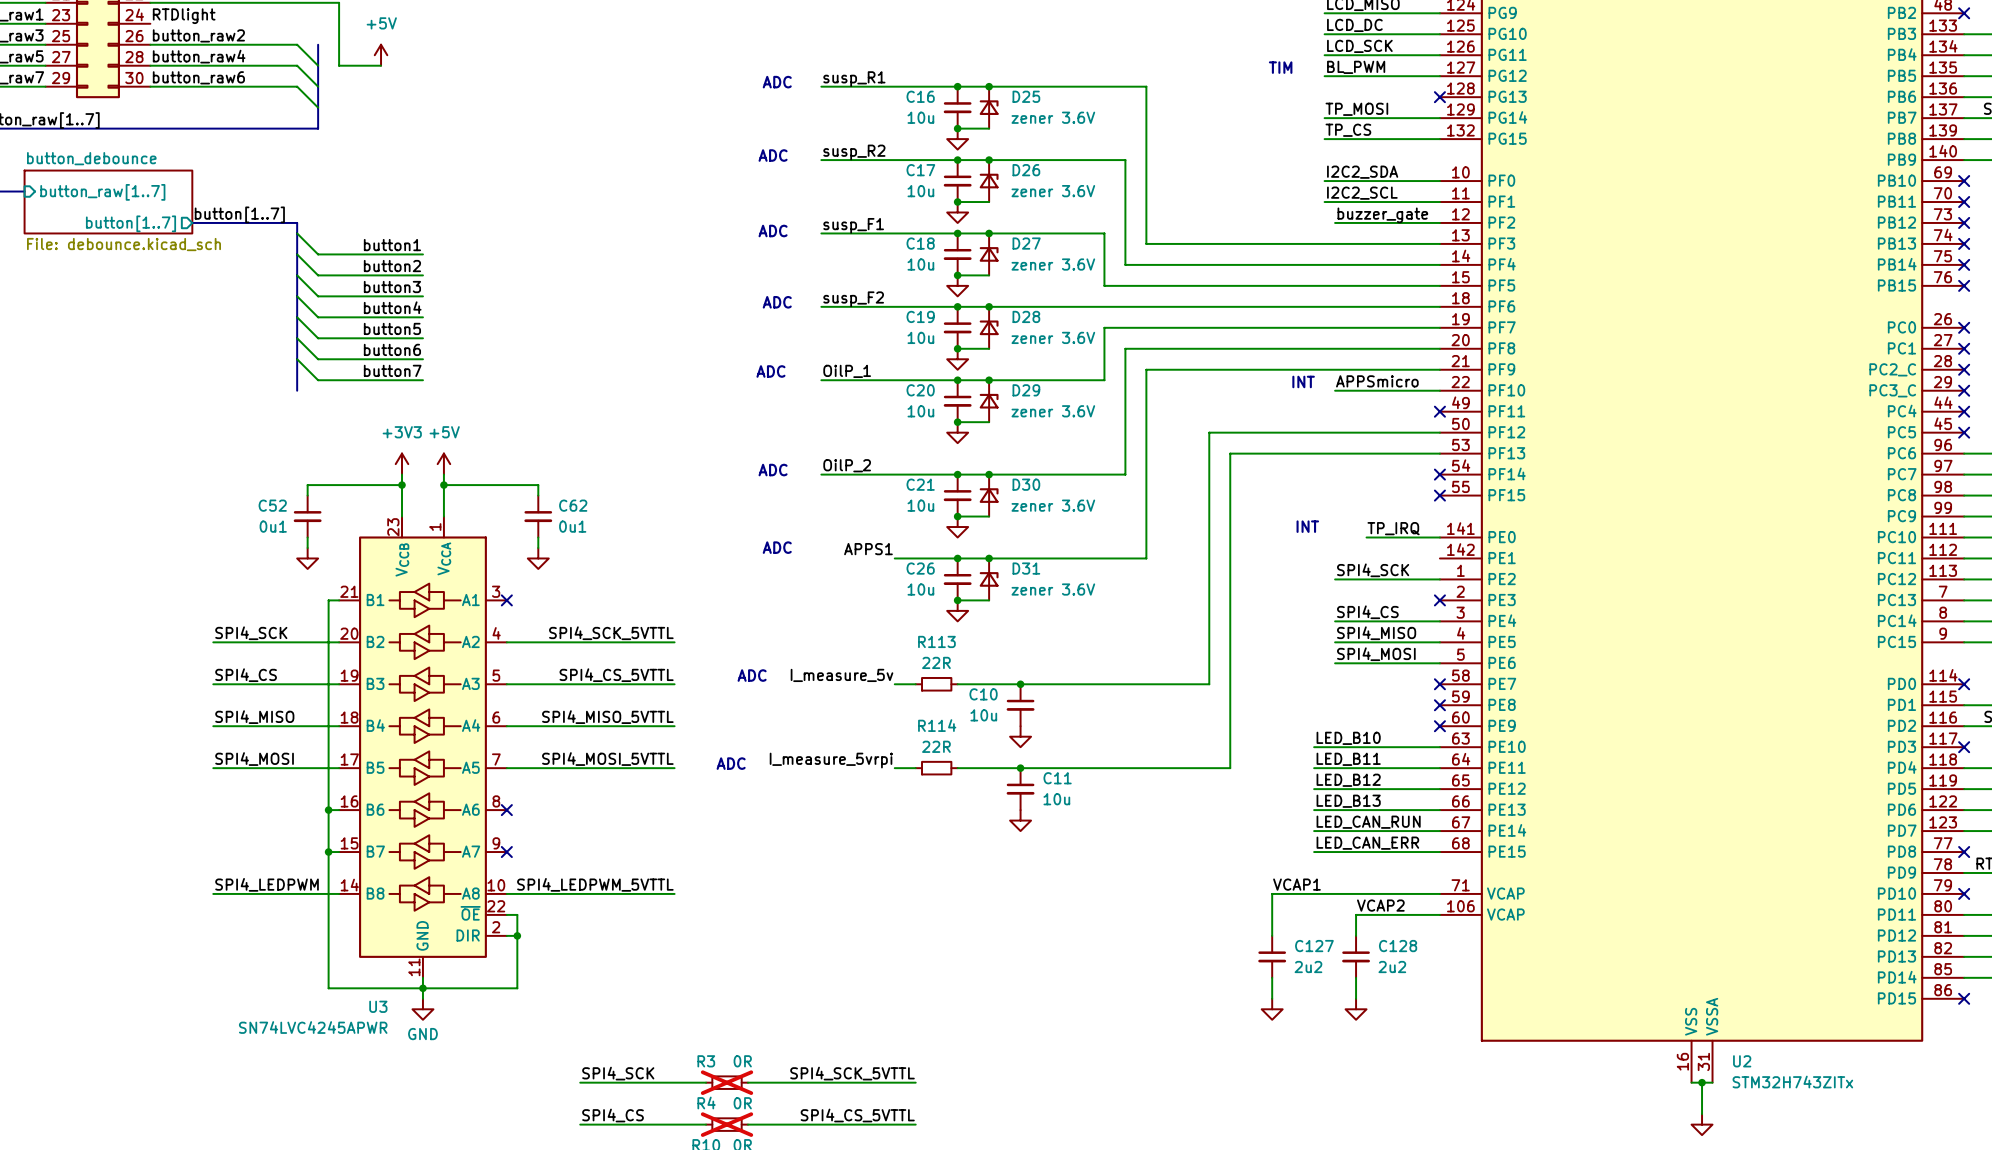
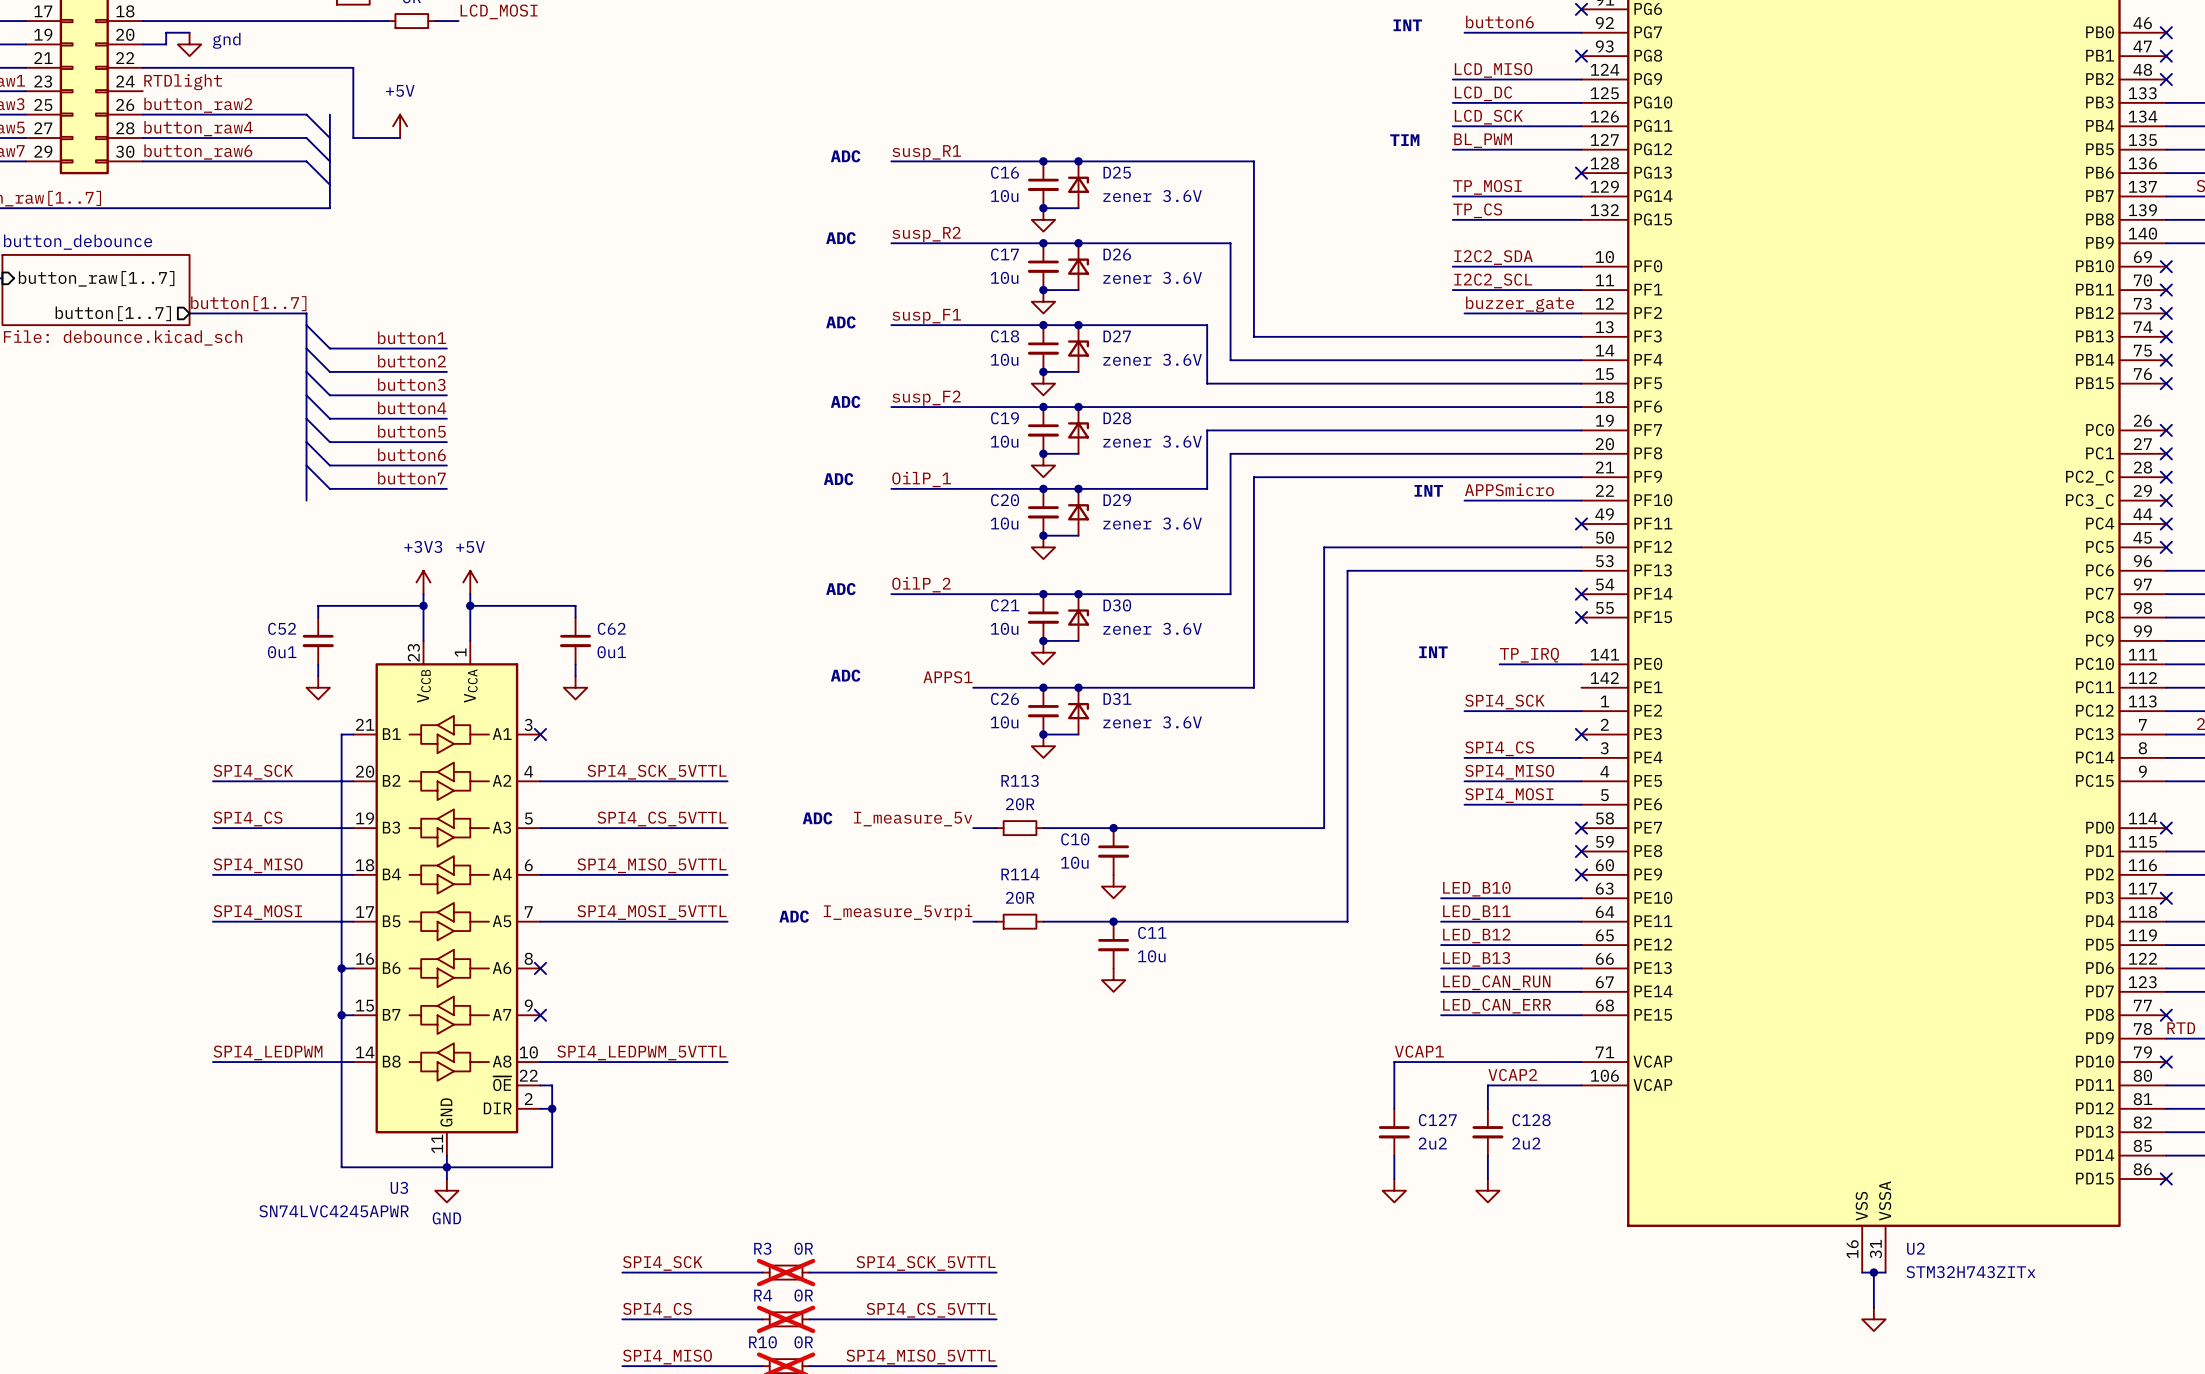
R113 value: 22R (936, 662) -> 20R (1020, 804)
R114 value: 22R (936, 746) -> 20R (1020, 897)

